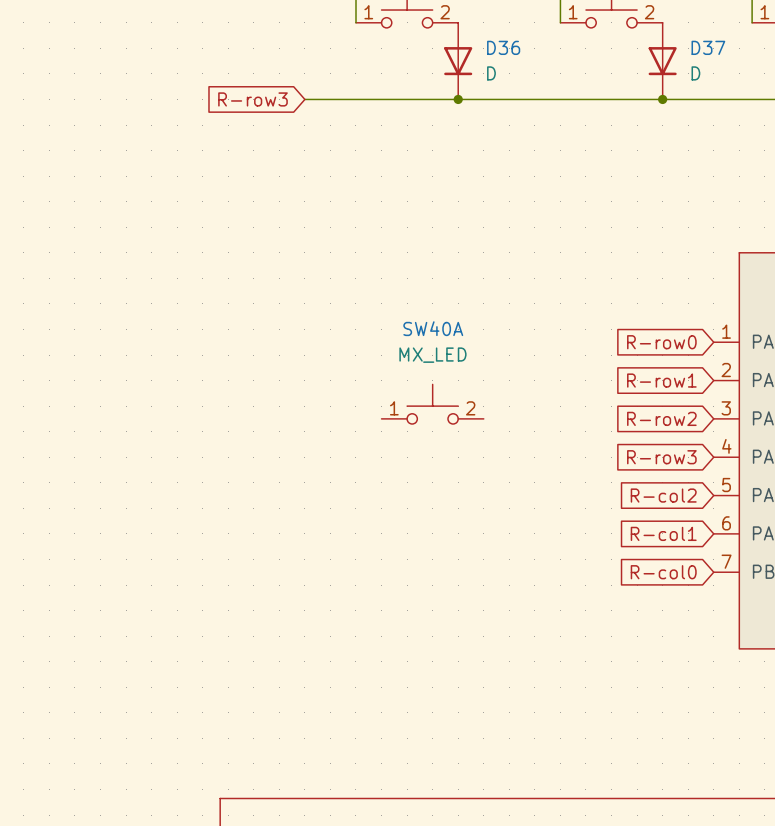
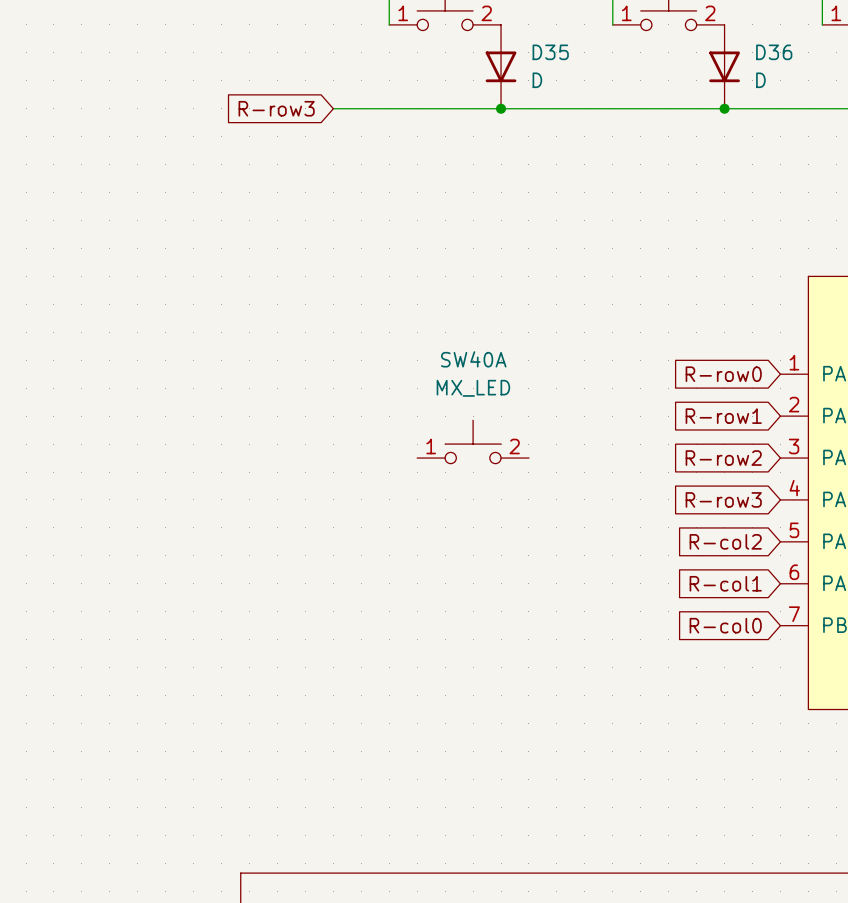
D36 name: D36 (503, 47) -> D35 (550, 52)
D37 name: D37 (708, 47) -> D36 (774, 52)

